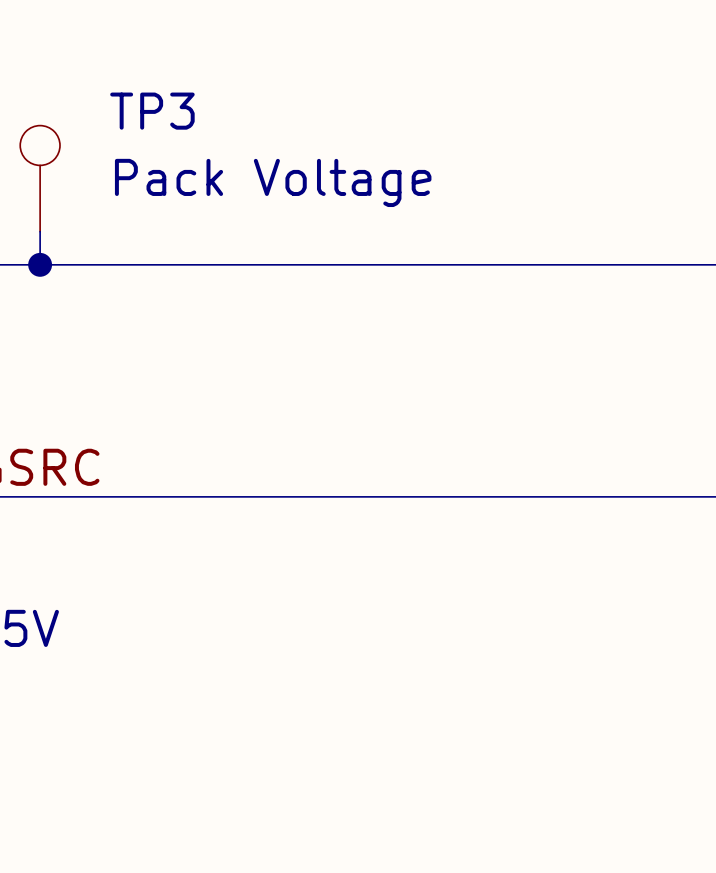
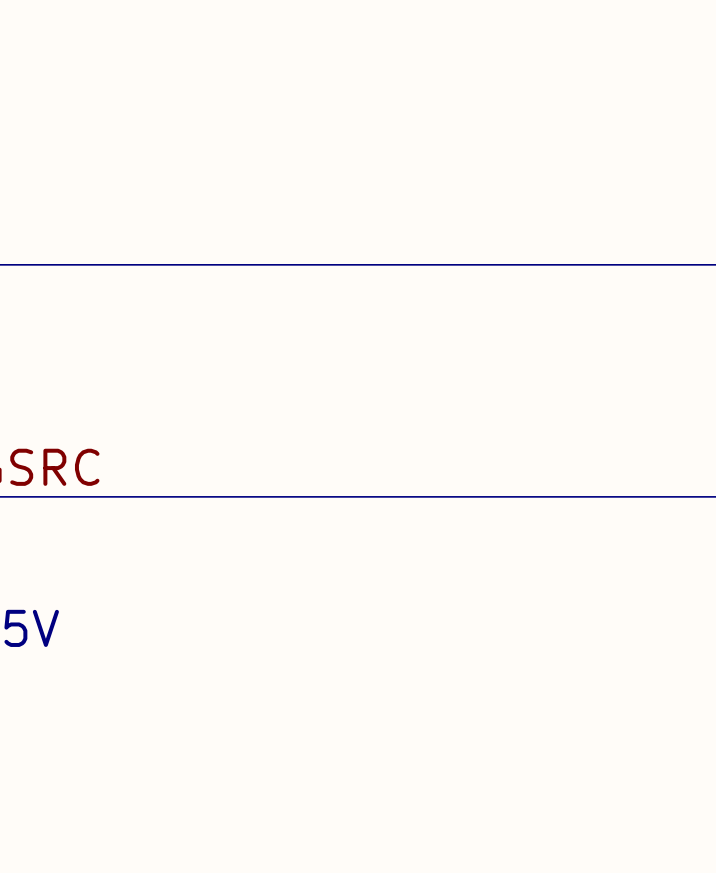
TP3: Pack Voltage (40, 178) -> none
wire: (40, 231) (40, 264) -> none
junction: (40, 264) -> none

